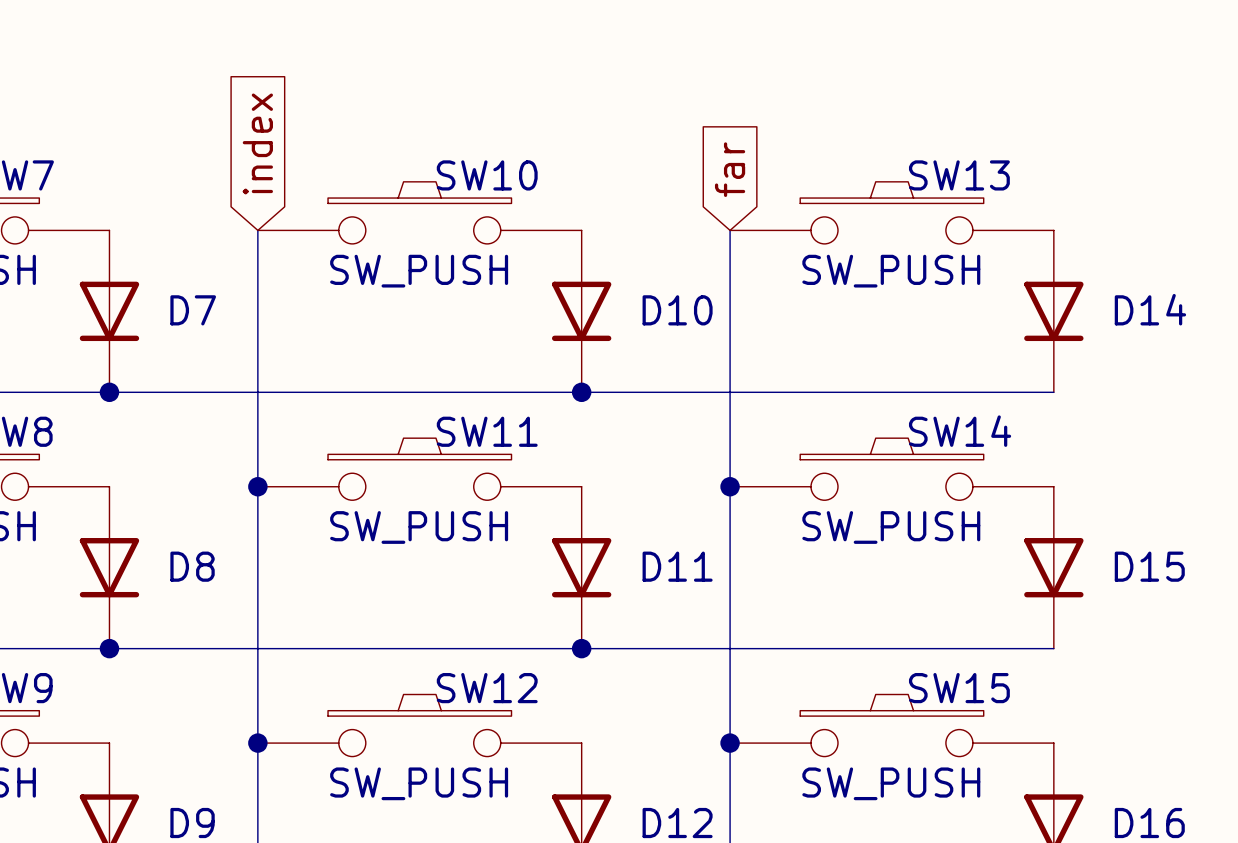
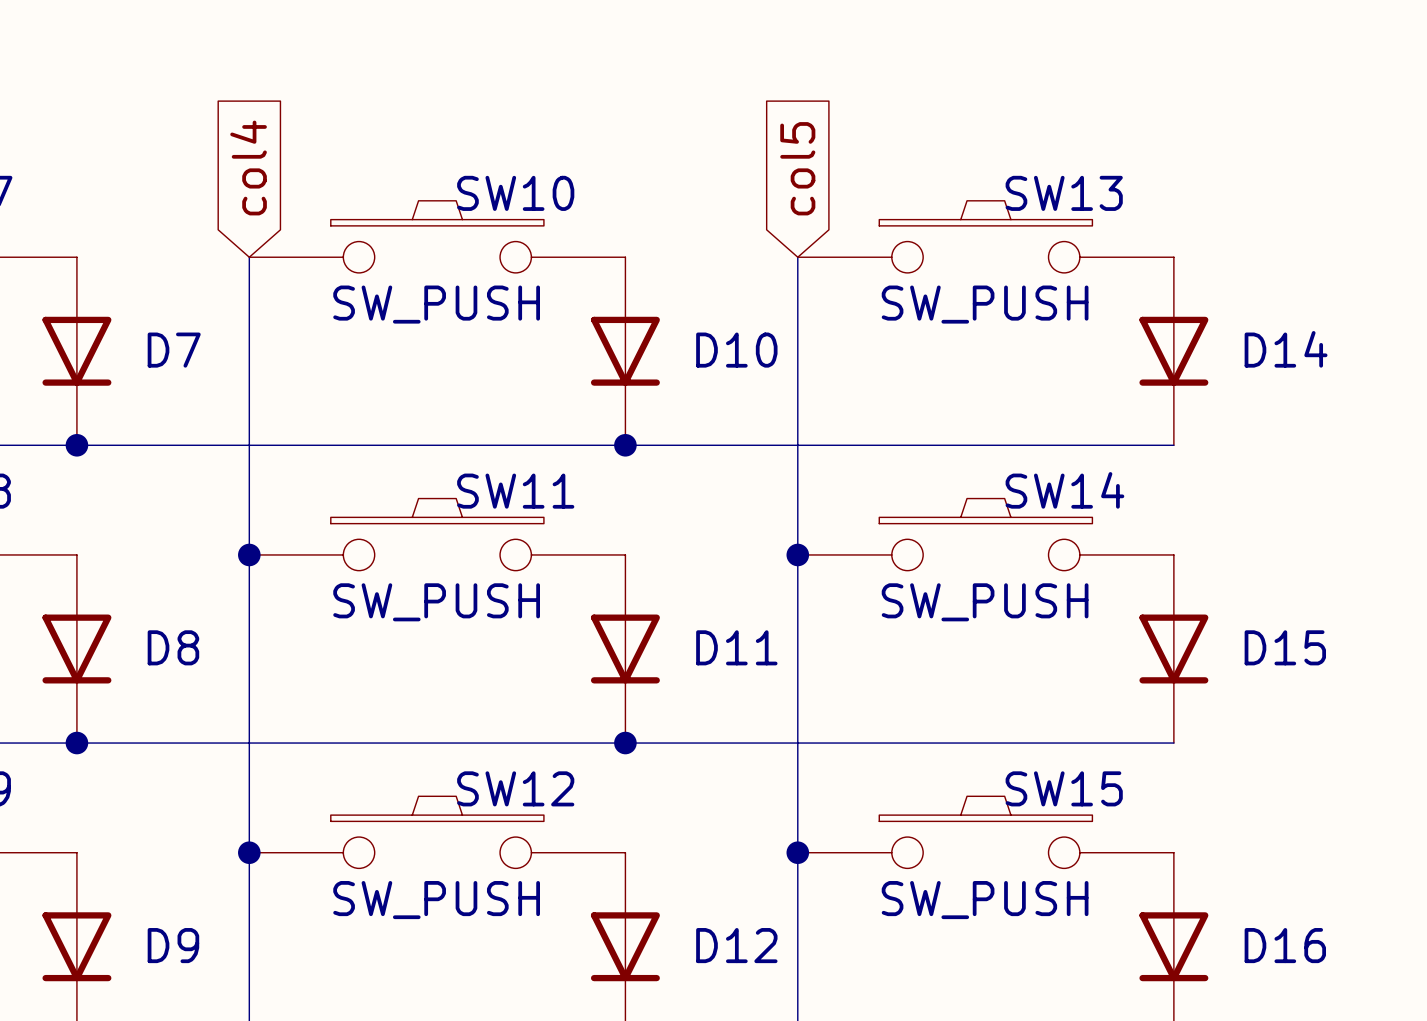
global label: index (257, 143) -> col4 (248, 168)
global label: far (730, 169) -> col5 (797, 168)

